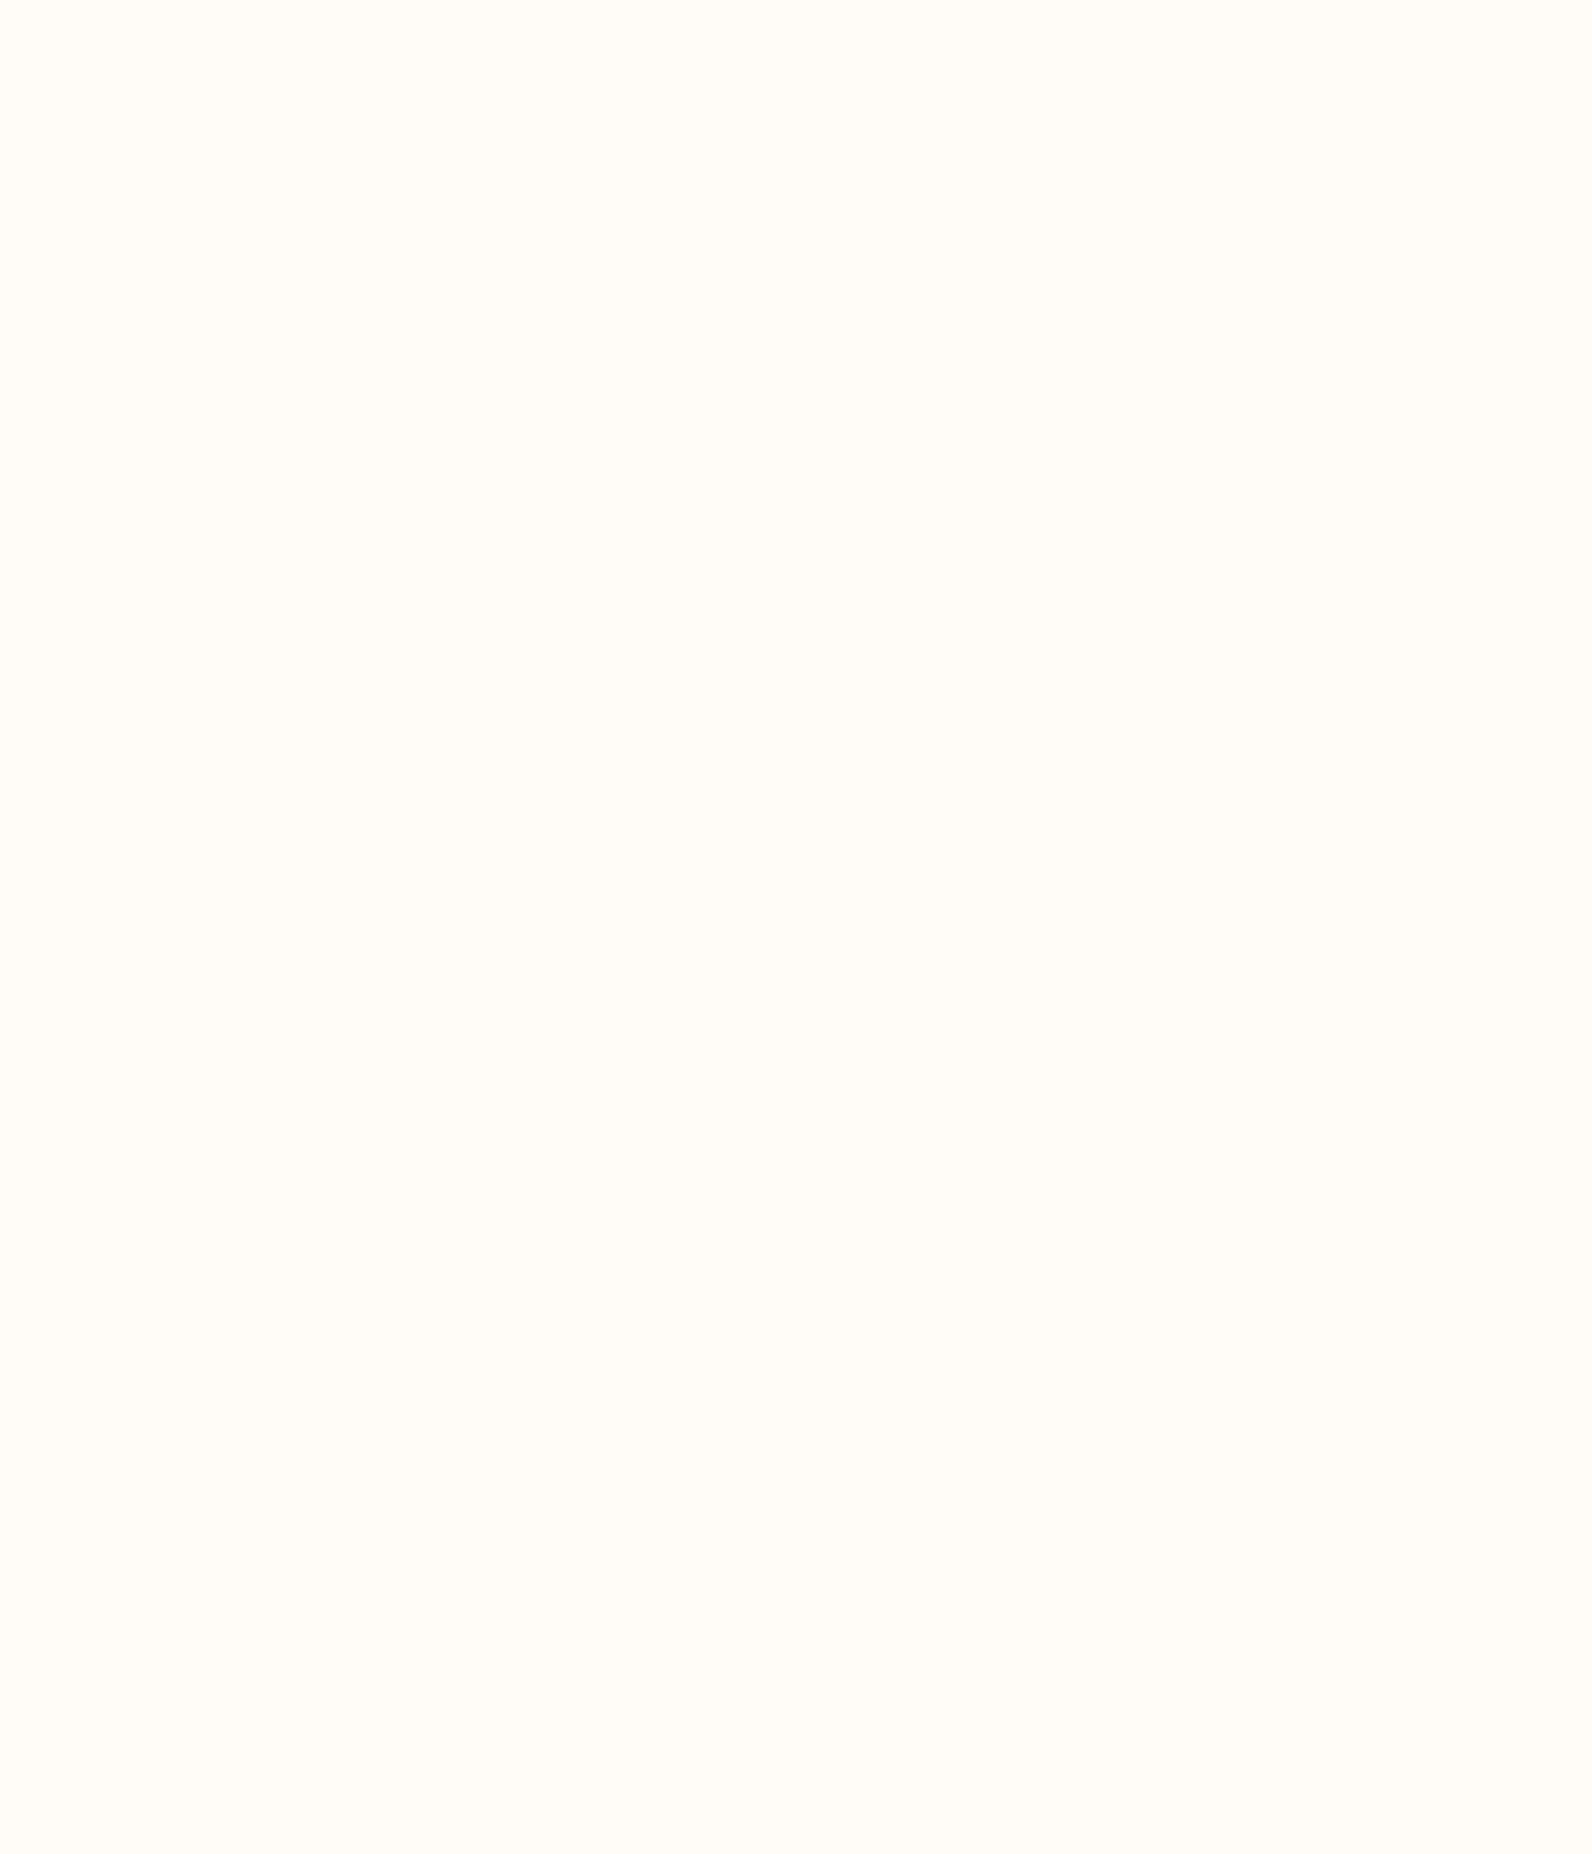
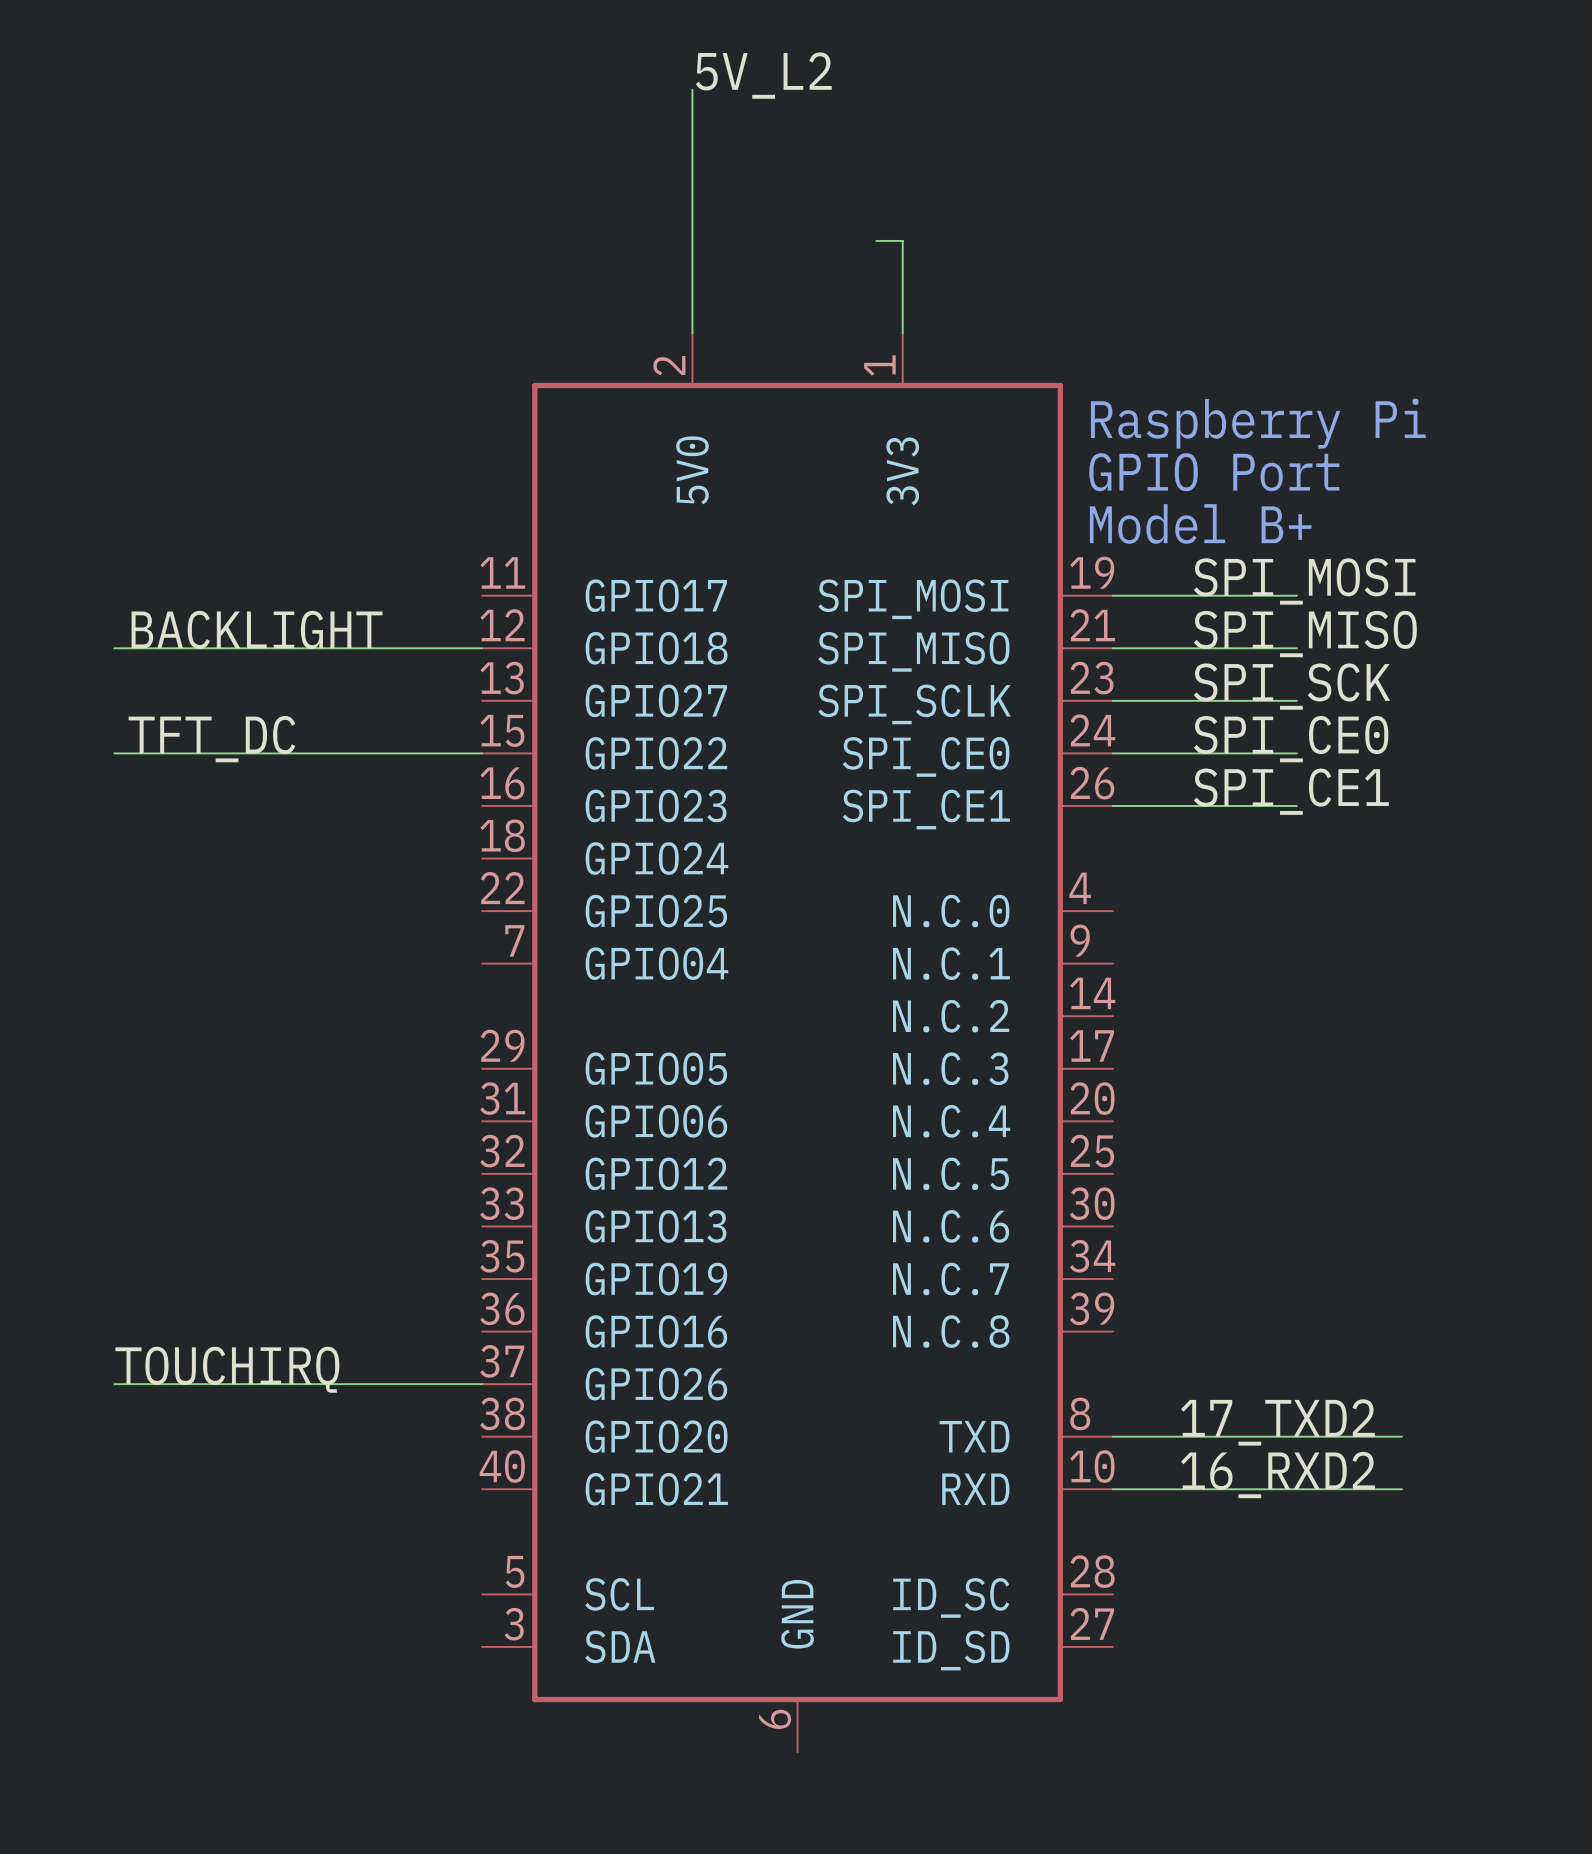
label: none -> 5V_L2 (763, 75)
wire: none -> (692, 89) (692, 332)
wire: none -> (876, 240) (902, 240) (902, 332)
label: none -> SPI_MOSI (1304, 581)
wire: none -> (1112, 595) (1296, 595)
label: none -> BACKLIGHT (257, 629)
label: none -> SPI_MISO (1305, 634)
wire: none -> (114, 648) (482, 648)
wire: none -> (1112, 648) (1296, 648)
label: none -> SPI_SCK (1291, 686)
wire: none -> (1112, 700) (1296, 700)
label: none -> TFT_DC (211, 739)
label: none -> SPI_CE0 (1291, 739)
wire: none -> (114, 753) (482, 753)
wire: none -> (1112, 753) (1296, 753)
label: none -> SPI_CE1 (1291, 791)
wire: none -> (1112, 805) (1296, 805)
part: none -> (797, 1042)
label: none -> TOUCHIRQ (227, 1369)
wire: none -> (114, 1384) (482, 1384)
label: none -> 17_TXD2 (1278, 1422)
wire: none -> (1112, 1436) (1402, 1436)
label: none -> 16_RXD2 (1278, 1475)
wire: none -> (1112, 1489) (1402, 1489)

